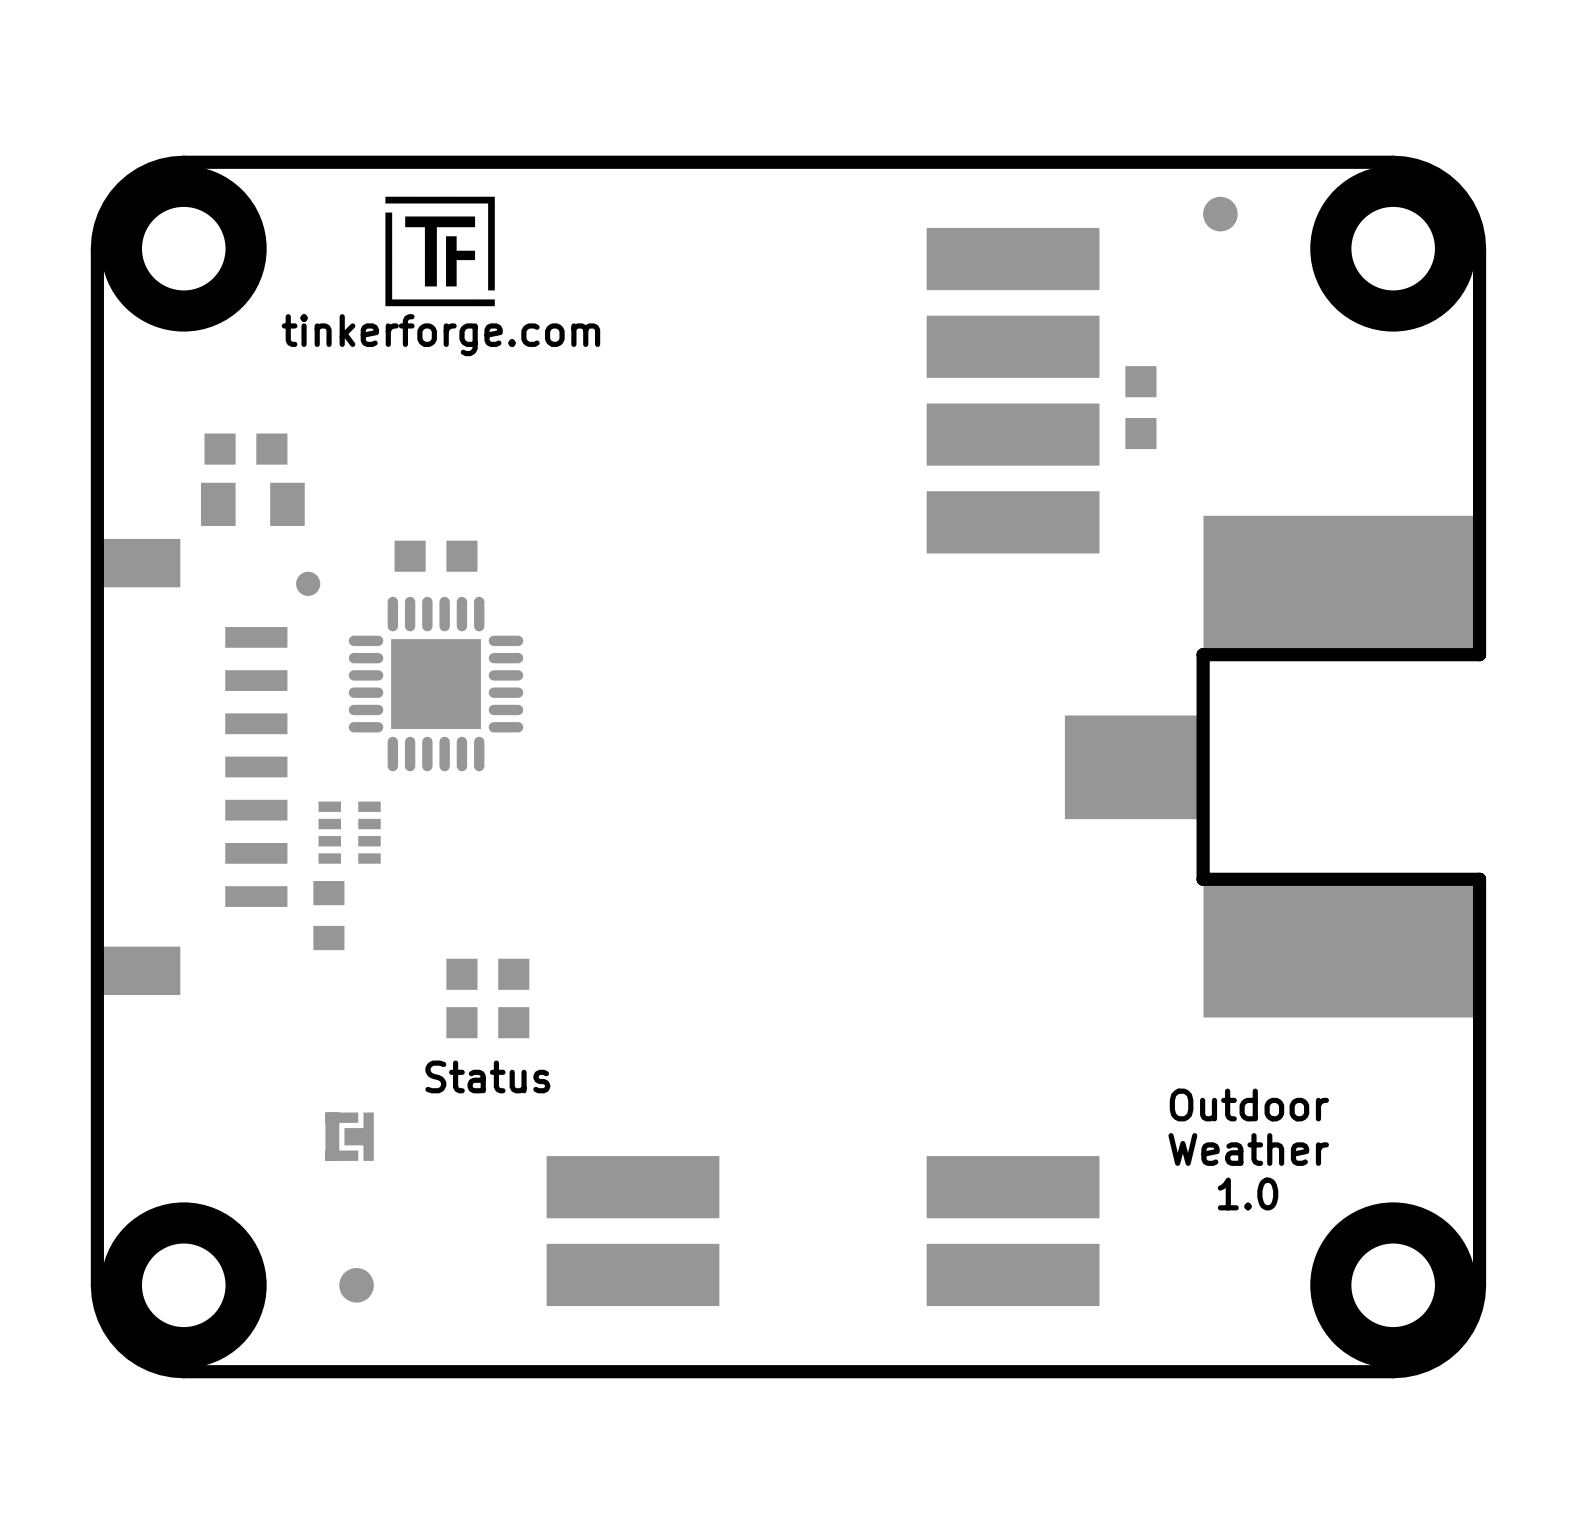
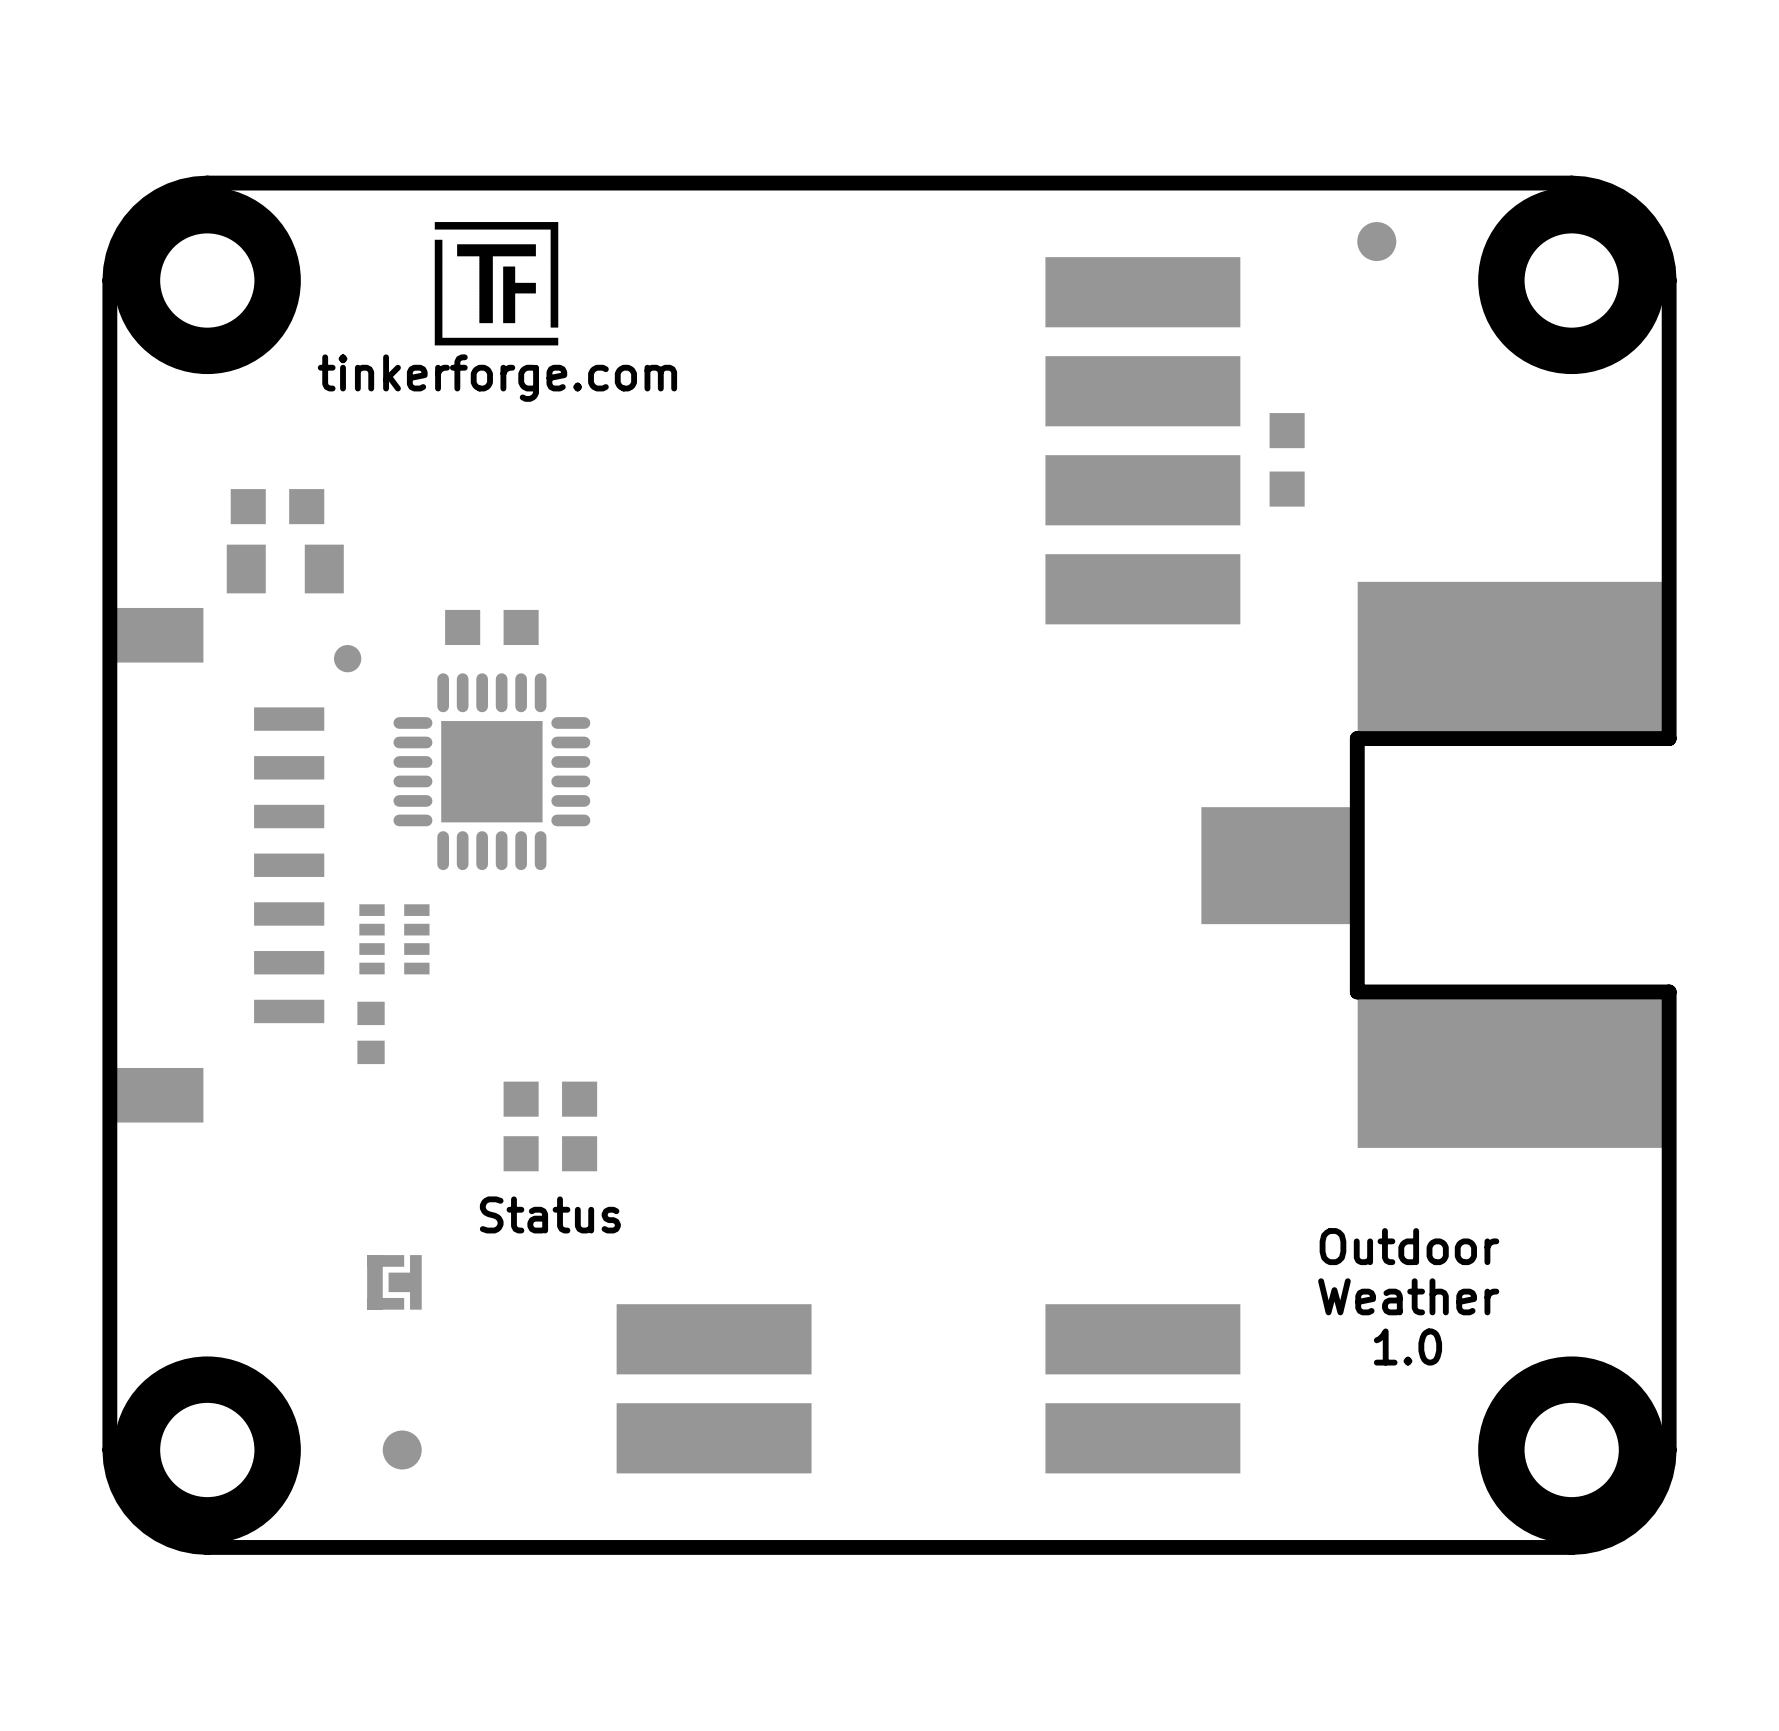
part footprint: [313, 881, 345, 951] -> [357, 1001, 385, 1065]

